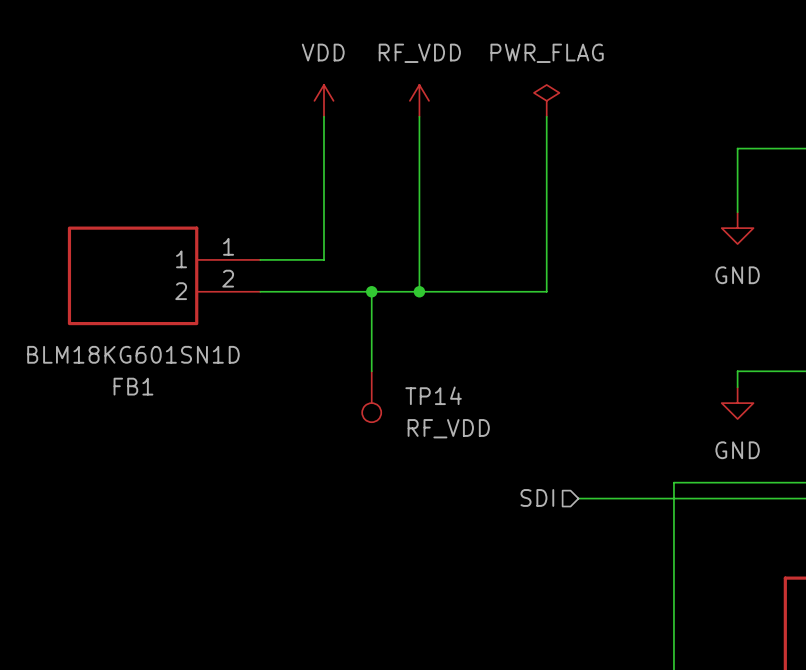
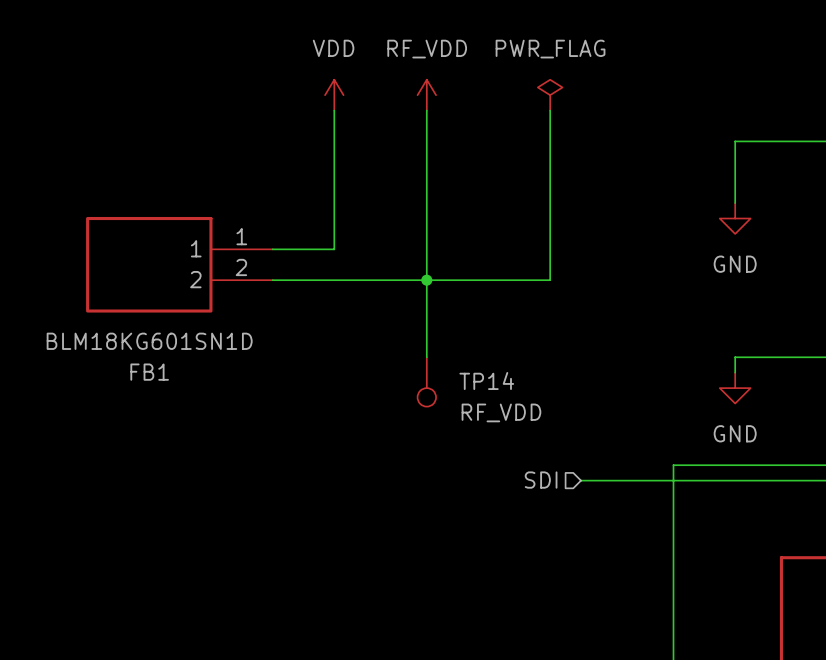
wire: (371, 291) (371, 371) -> (426, 280) (426, 357)
junction: (371, 291) -> none
TP14 position: (371, 396) -> (426, 381)

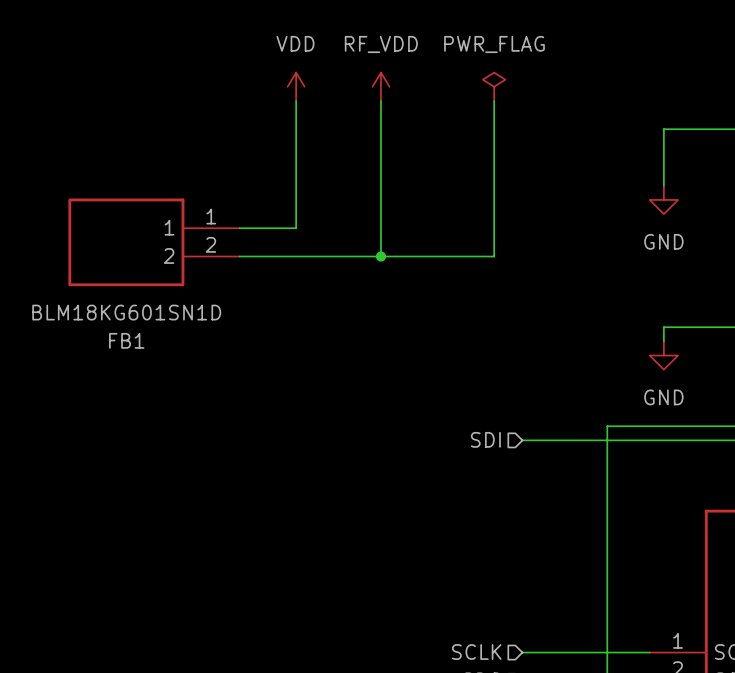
wire: (426, 280) (426, 357) -> none
TP14: RF_VDD (426, 381) -> none

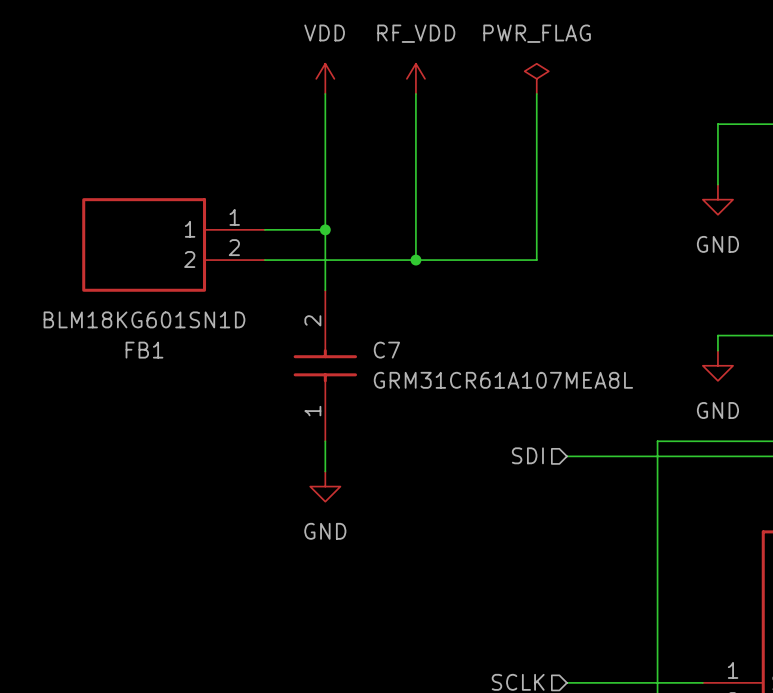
wire: none -> (325, 229) (325, 290)
junction: none -> (325, 229)
C7: none -> GRM31CR61A107MEA8L (325, 365)
wire: none -> (325, 441) (325, 471)
power symbol: none -> GND (325, 486)

